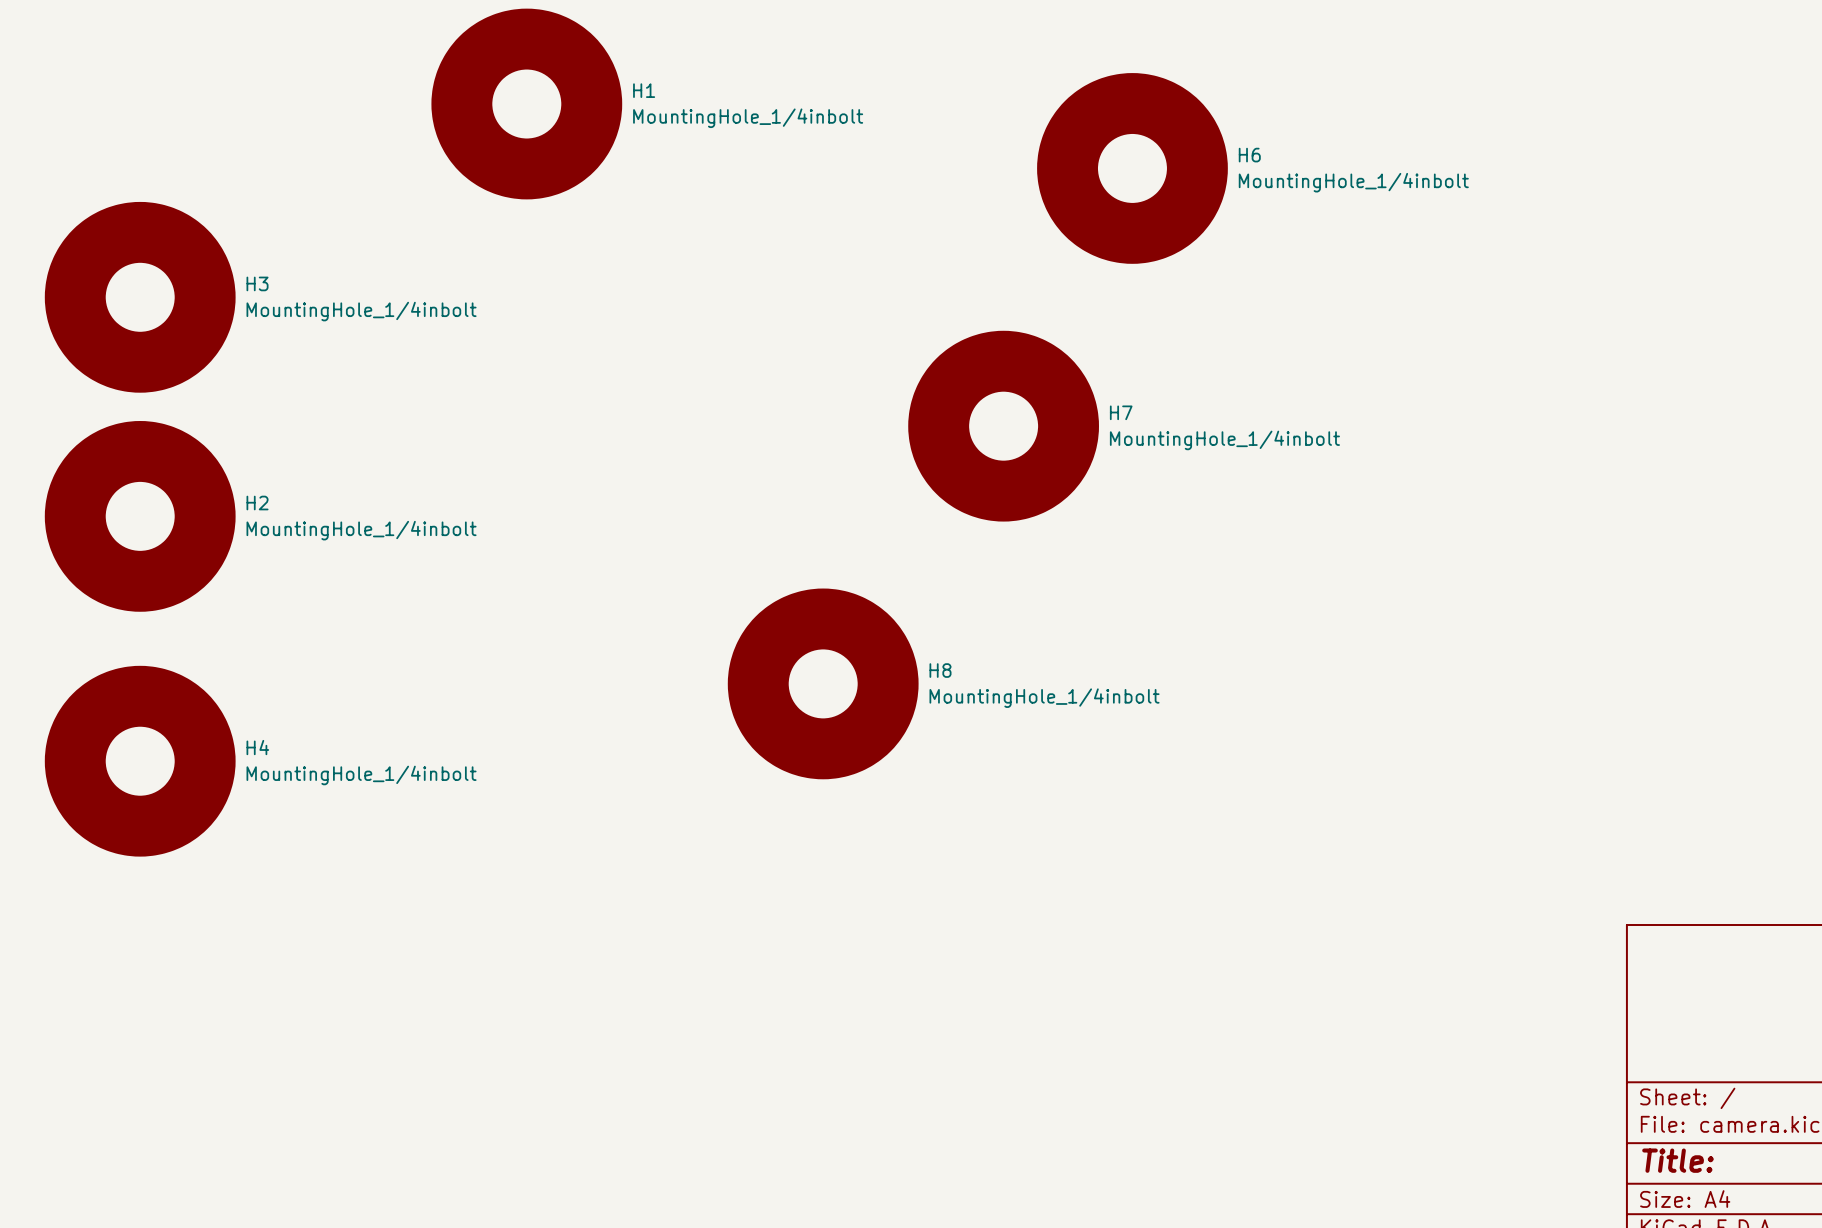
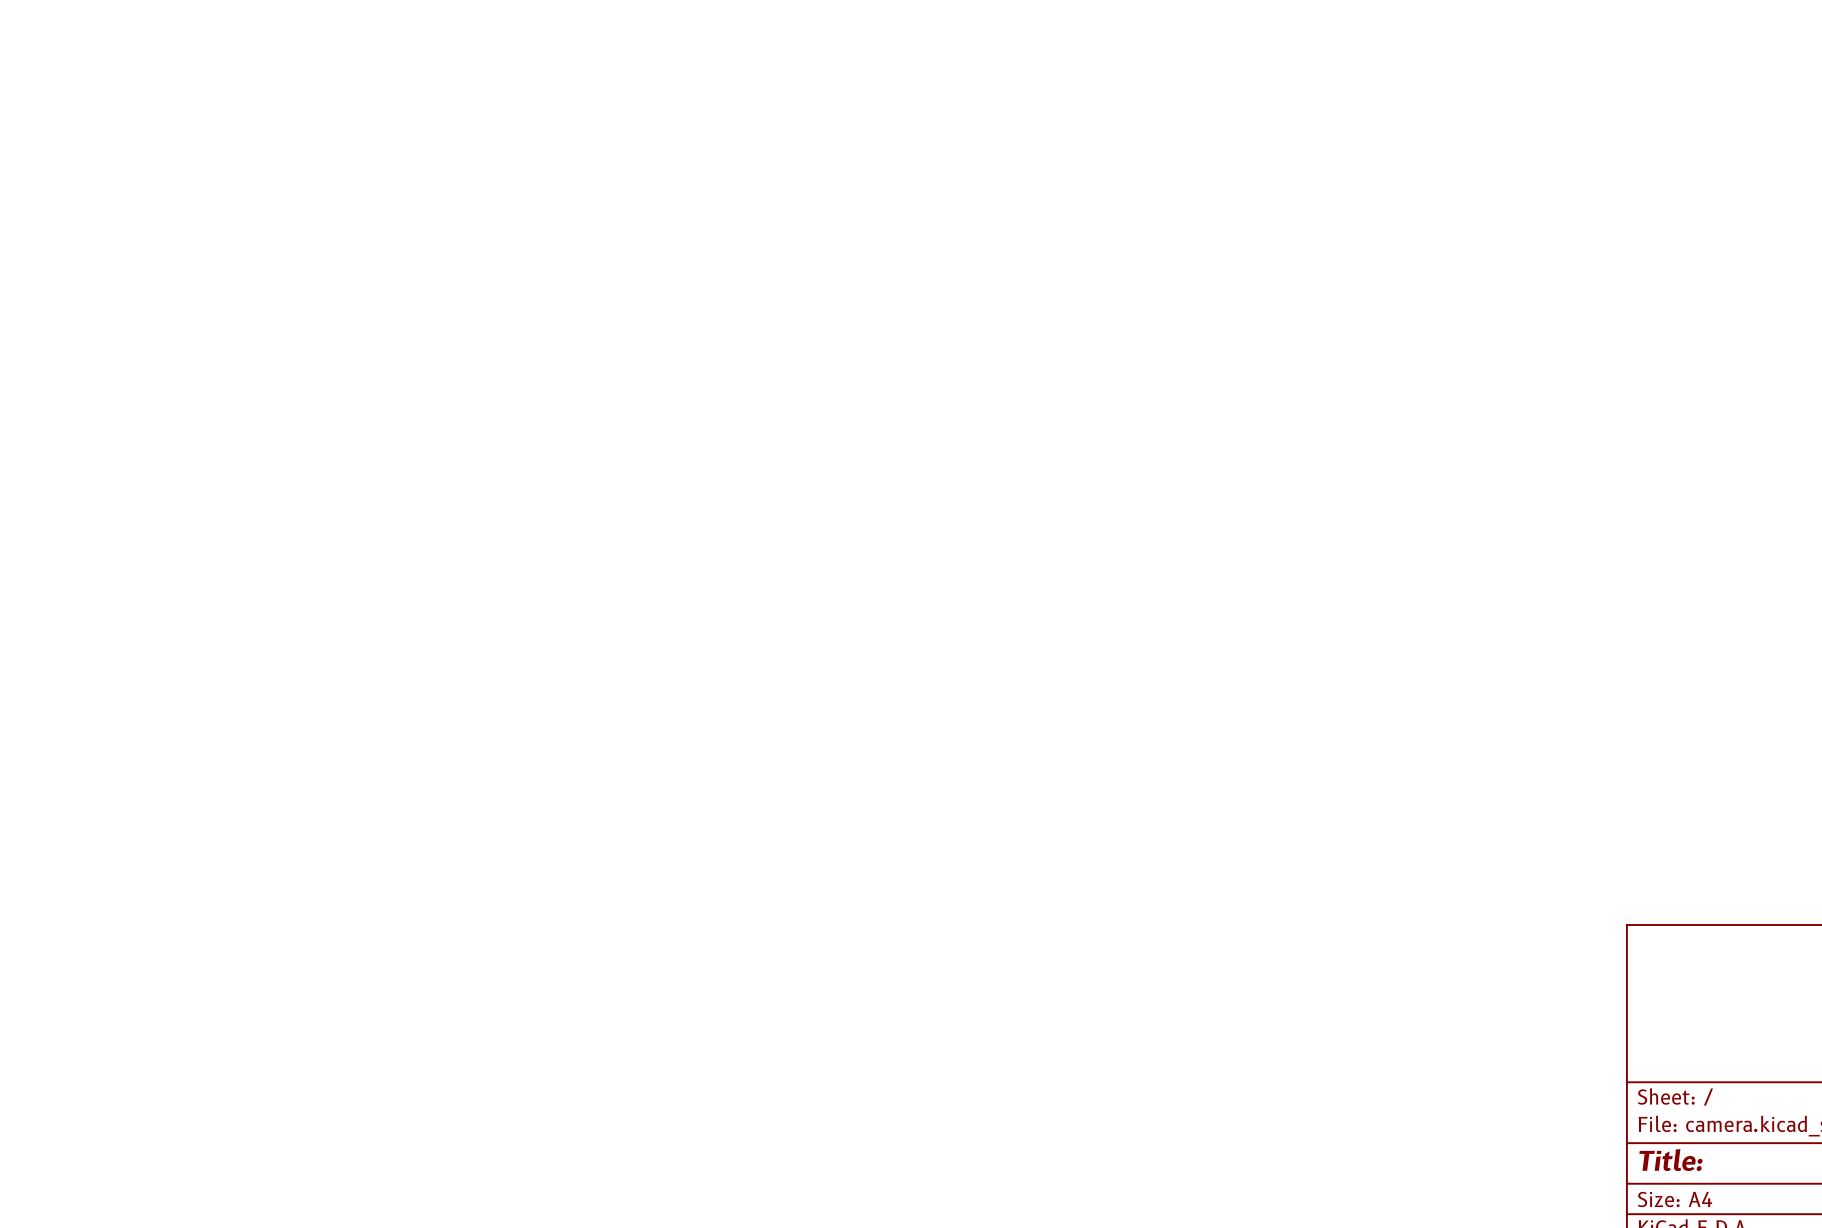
H1: MountingHole_1/4inbolt (526, 104) -> none
H6: MountingHole_1/4inbolt (1132, 168) -> none
H3: MountingHole_1/4inbolt (140, 297) -> none
H7: MountingHole_1/4inbolt (1003, 426) -> none
H2: MountingHole_1/4inbolt (140, 516) -> none
H8: MountingHole_1/4inbolt (823, 683) -> none
H4: MountingHole_1/4inbolt (140, 761) -> none

